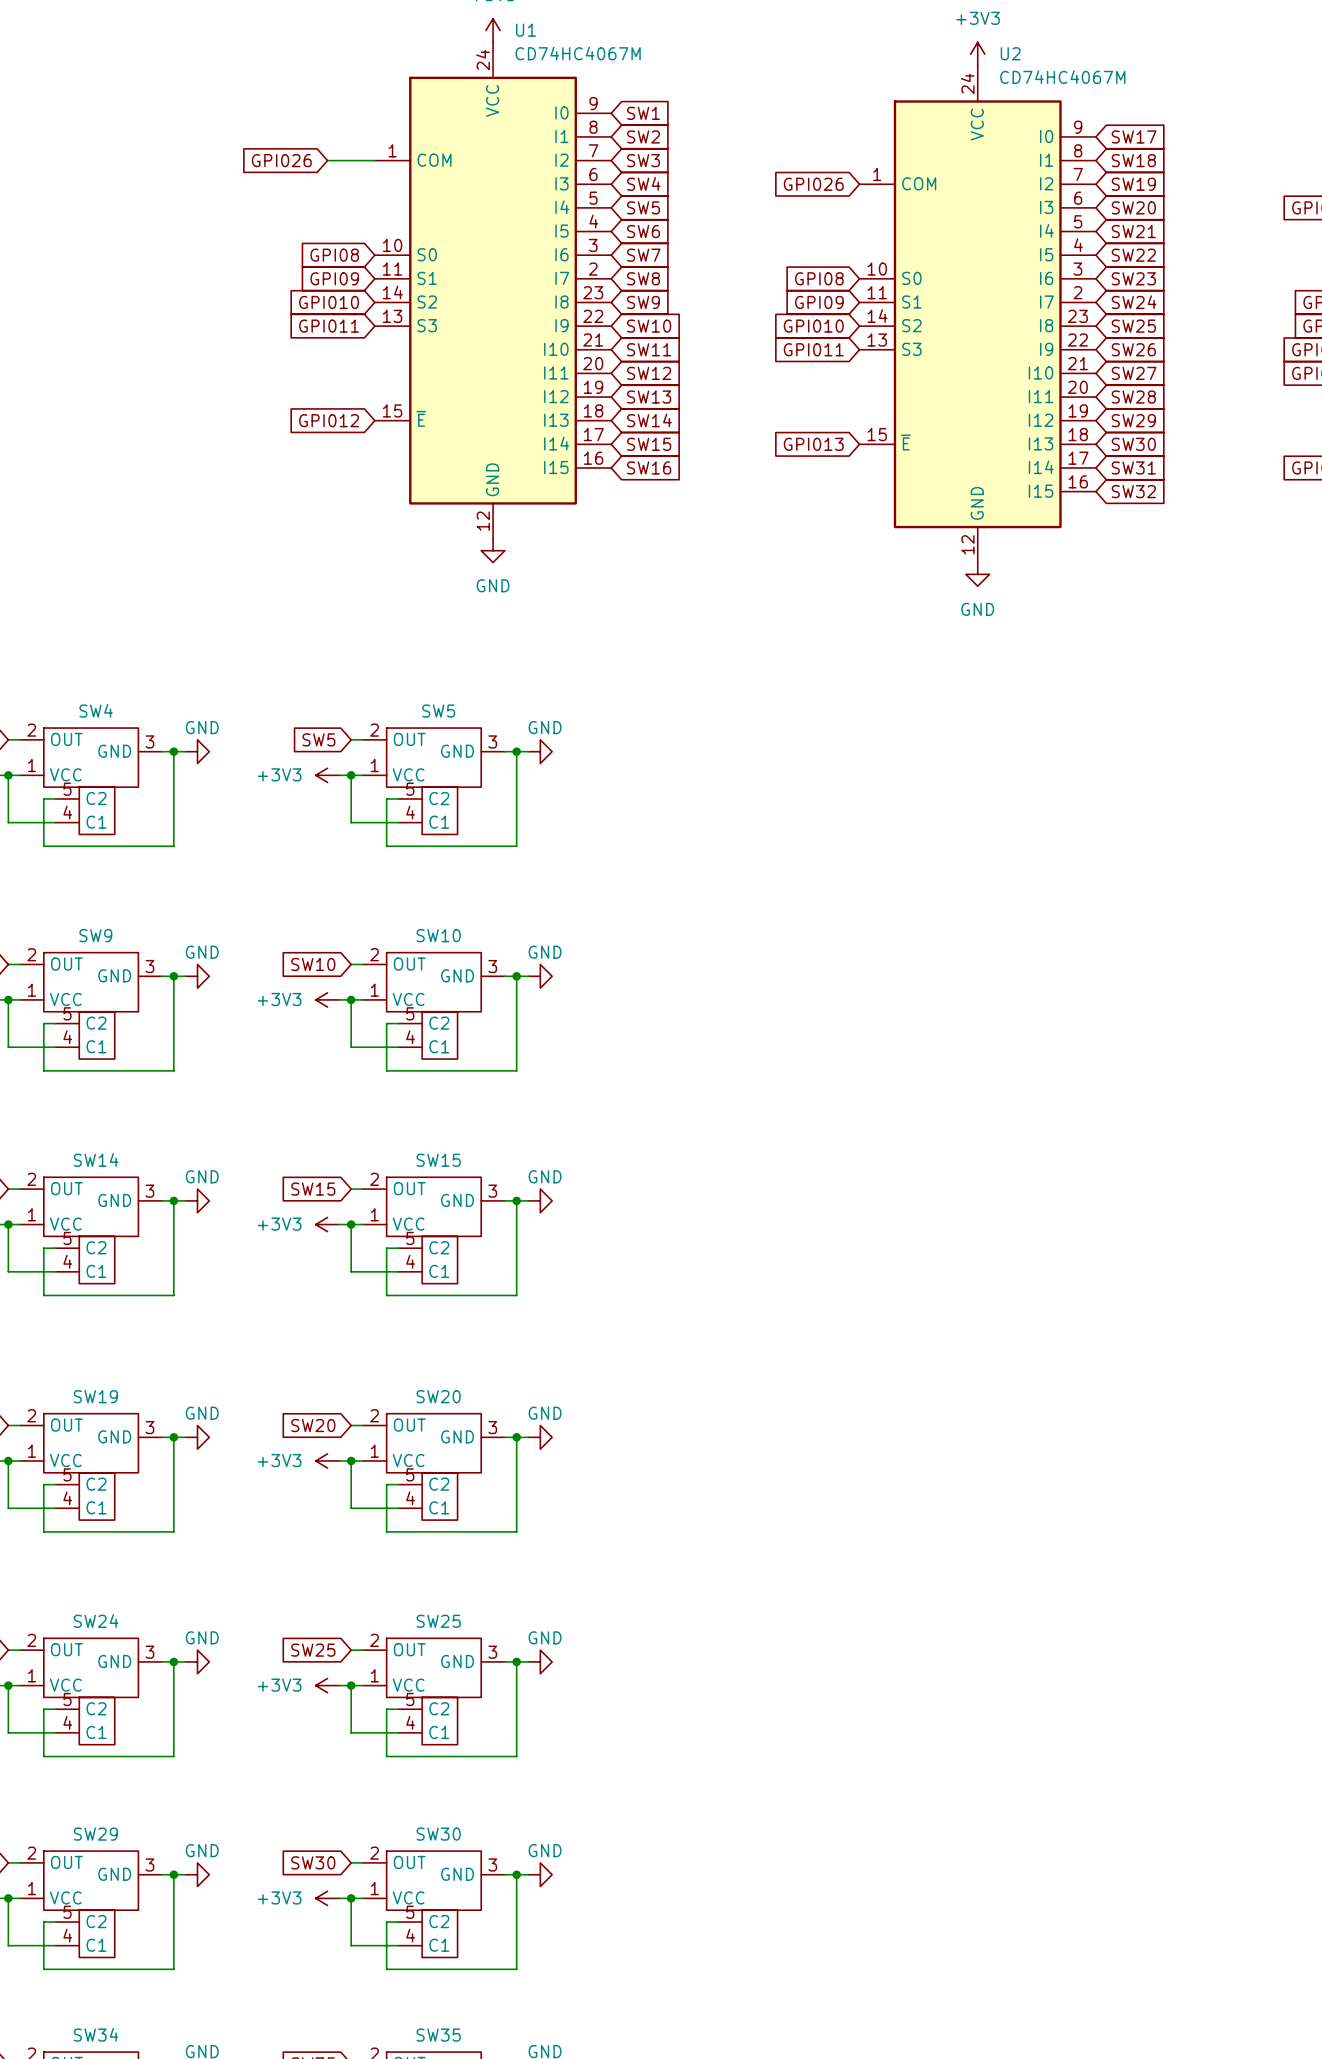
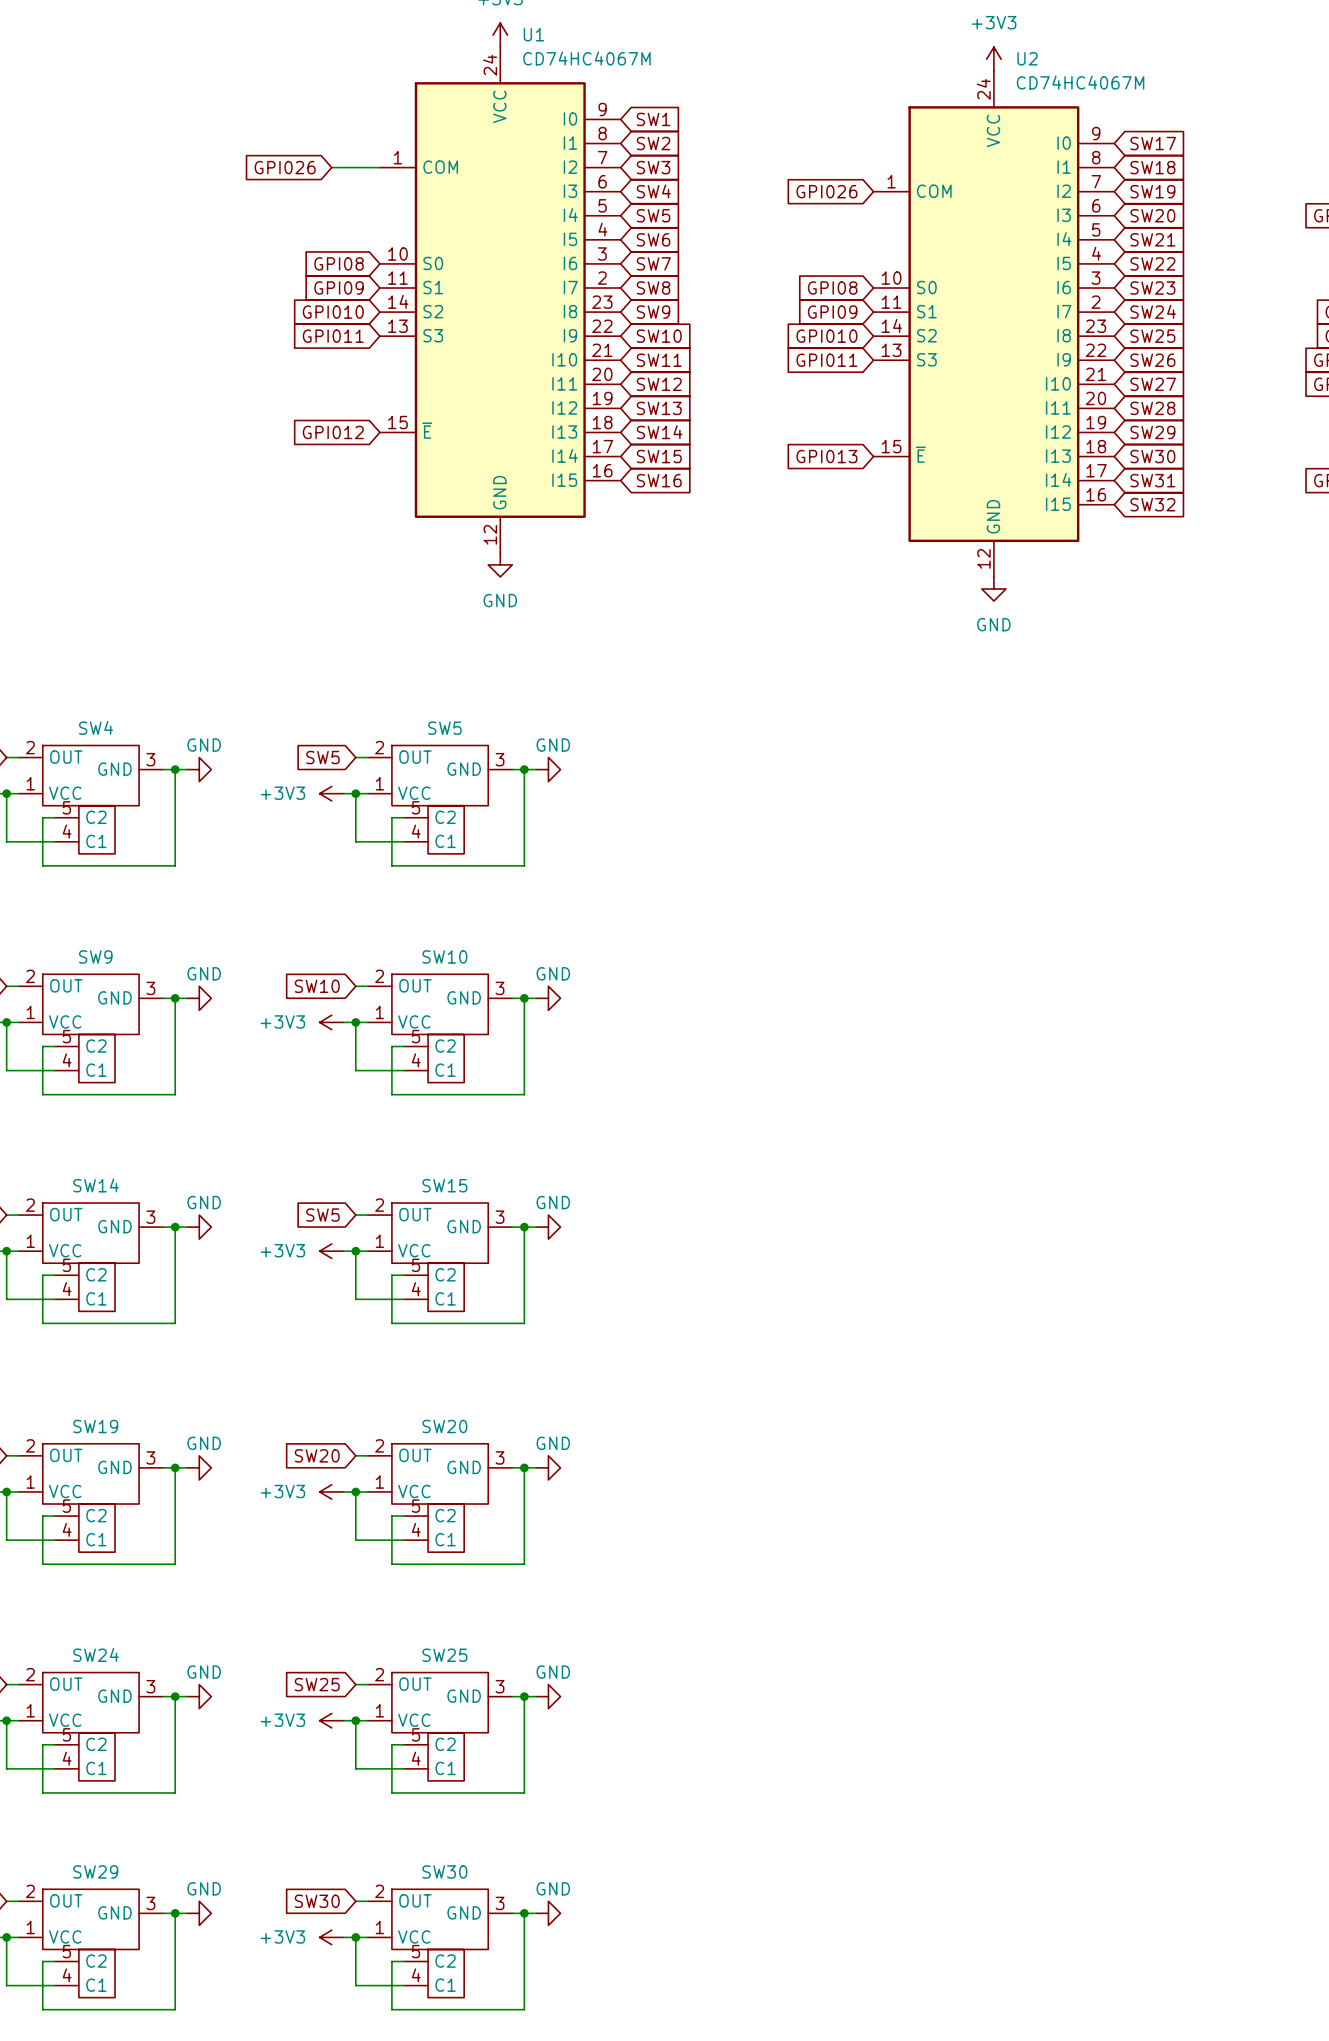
global label: SW15 (313, 1189) -> SW5 (322, 1215)

